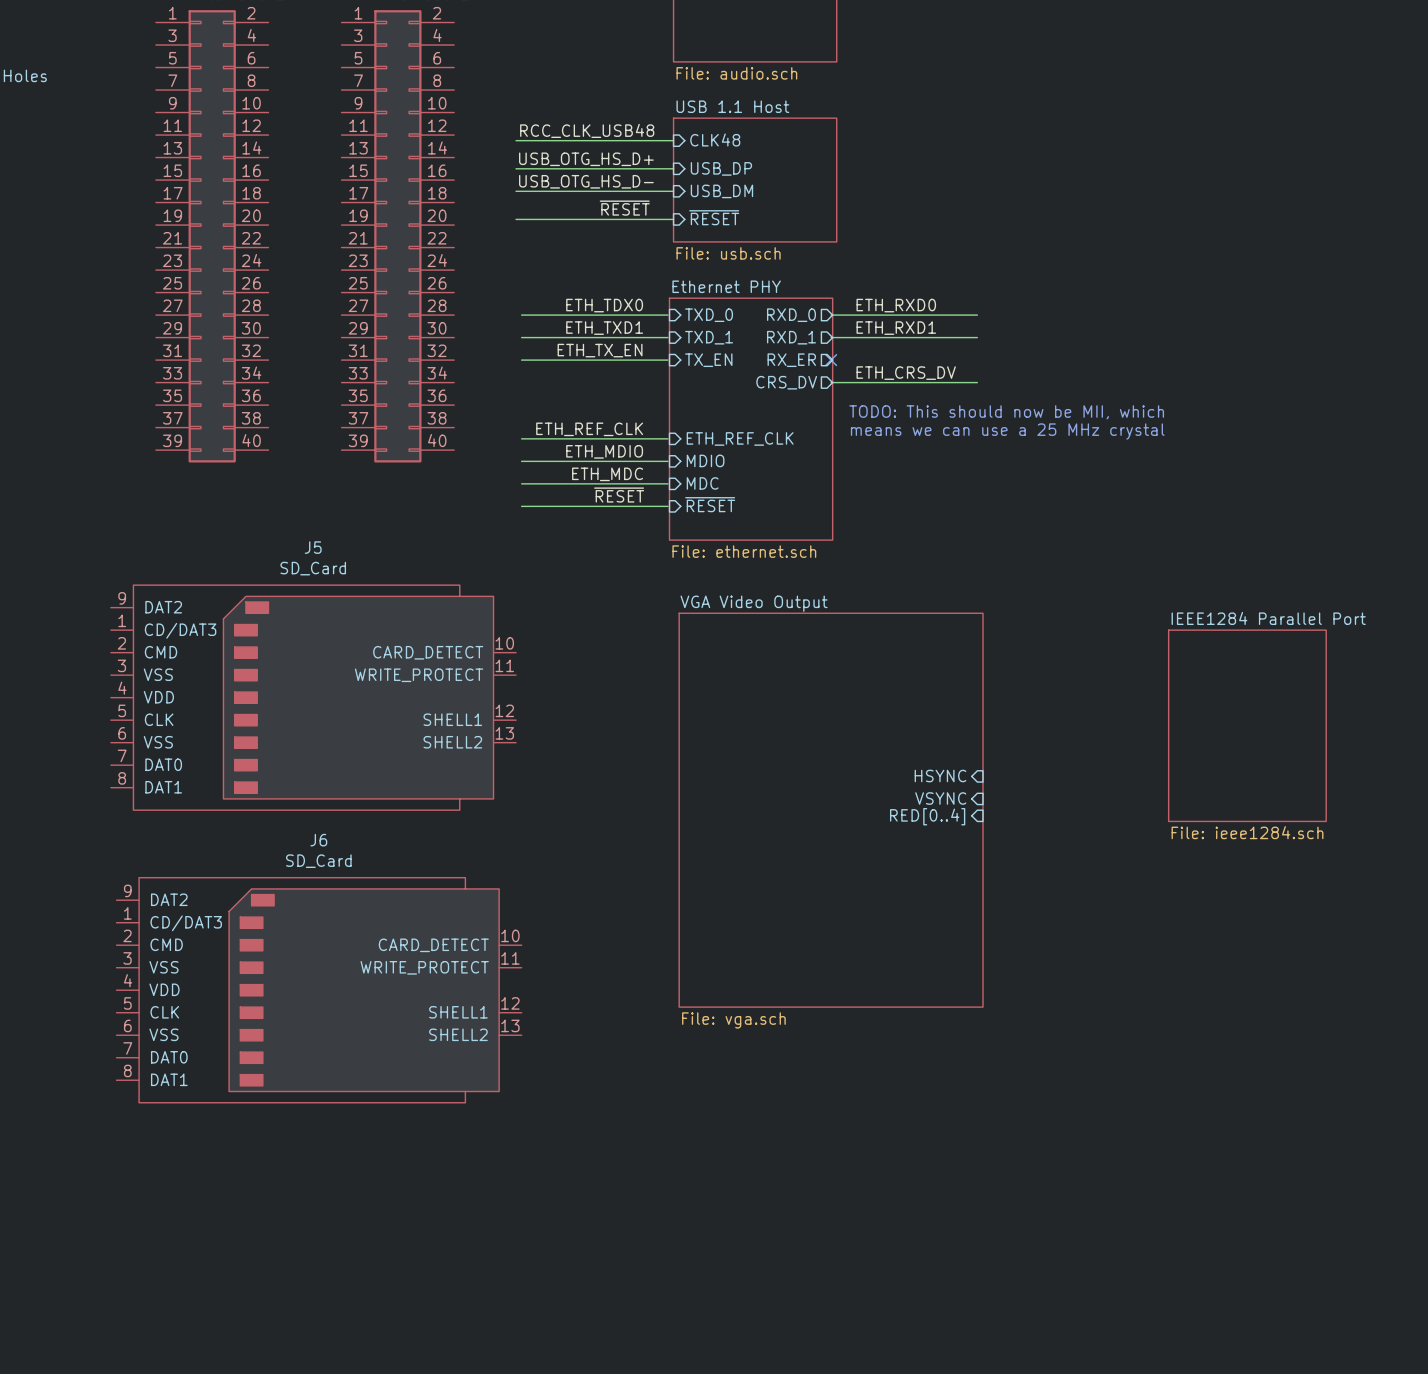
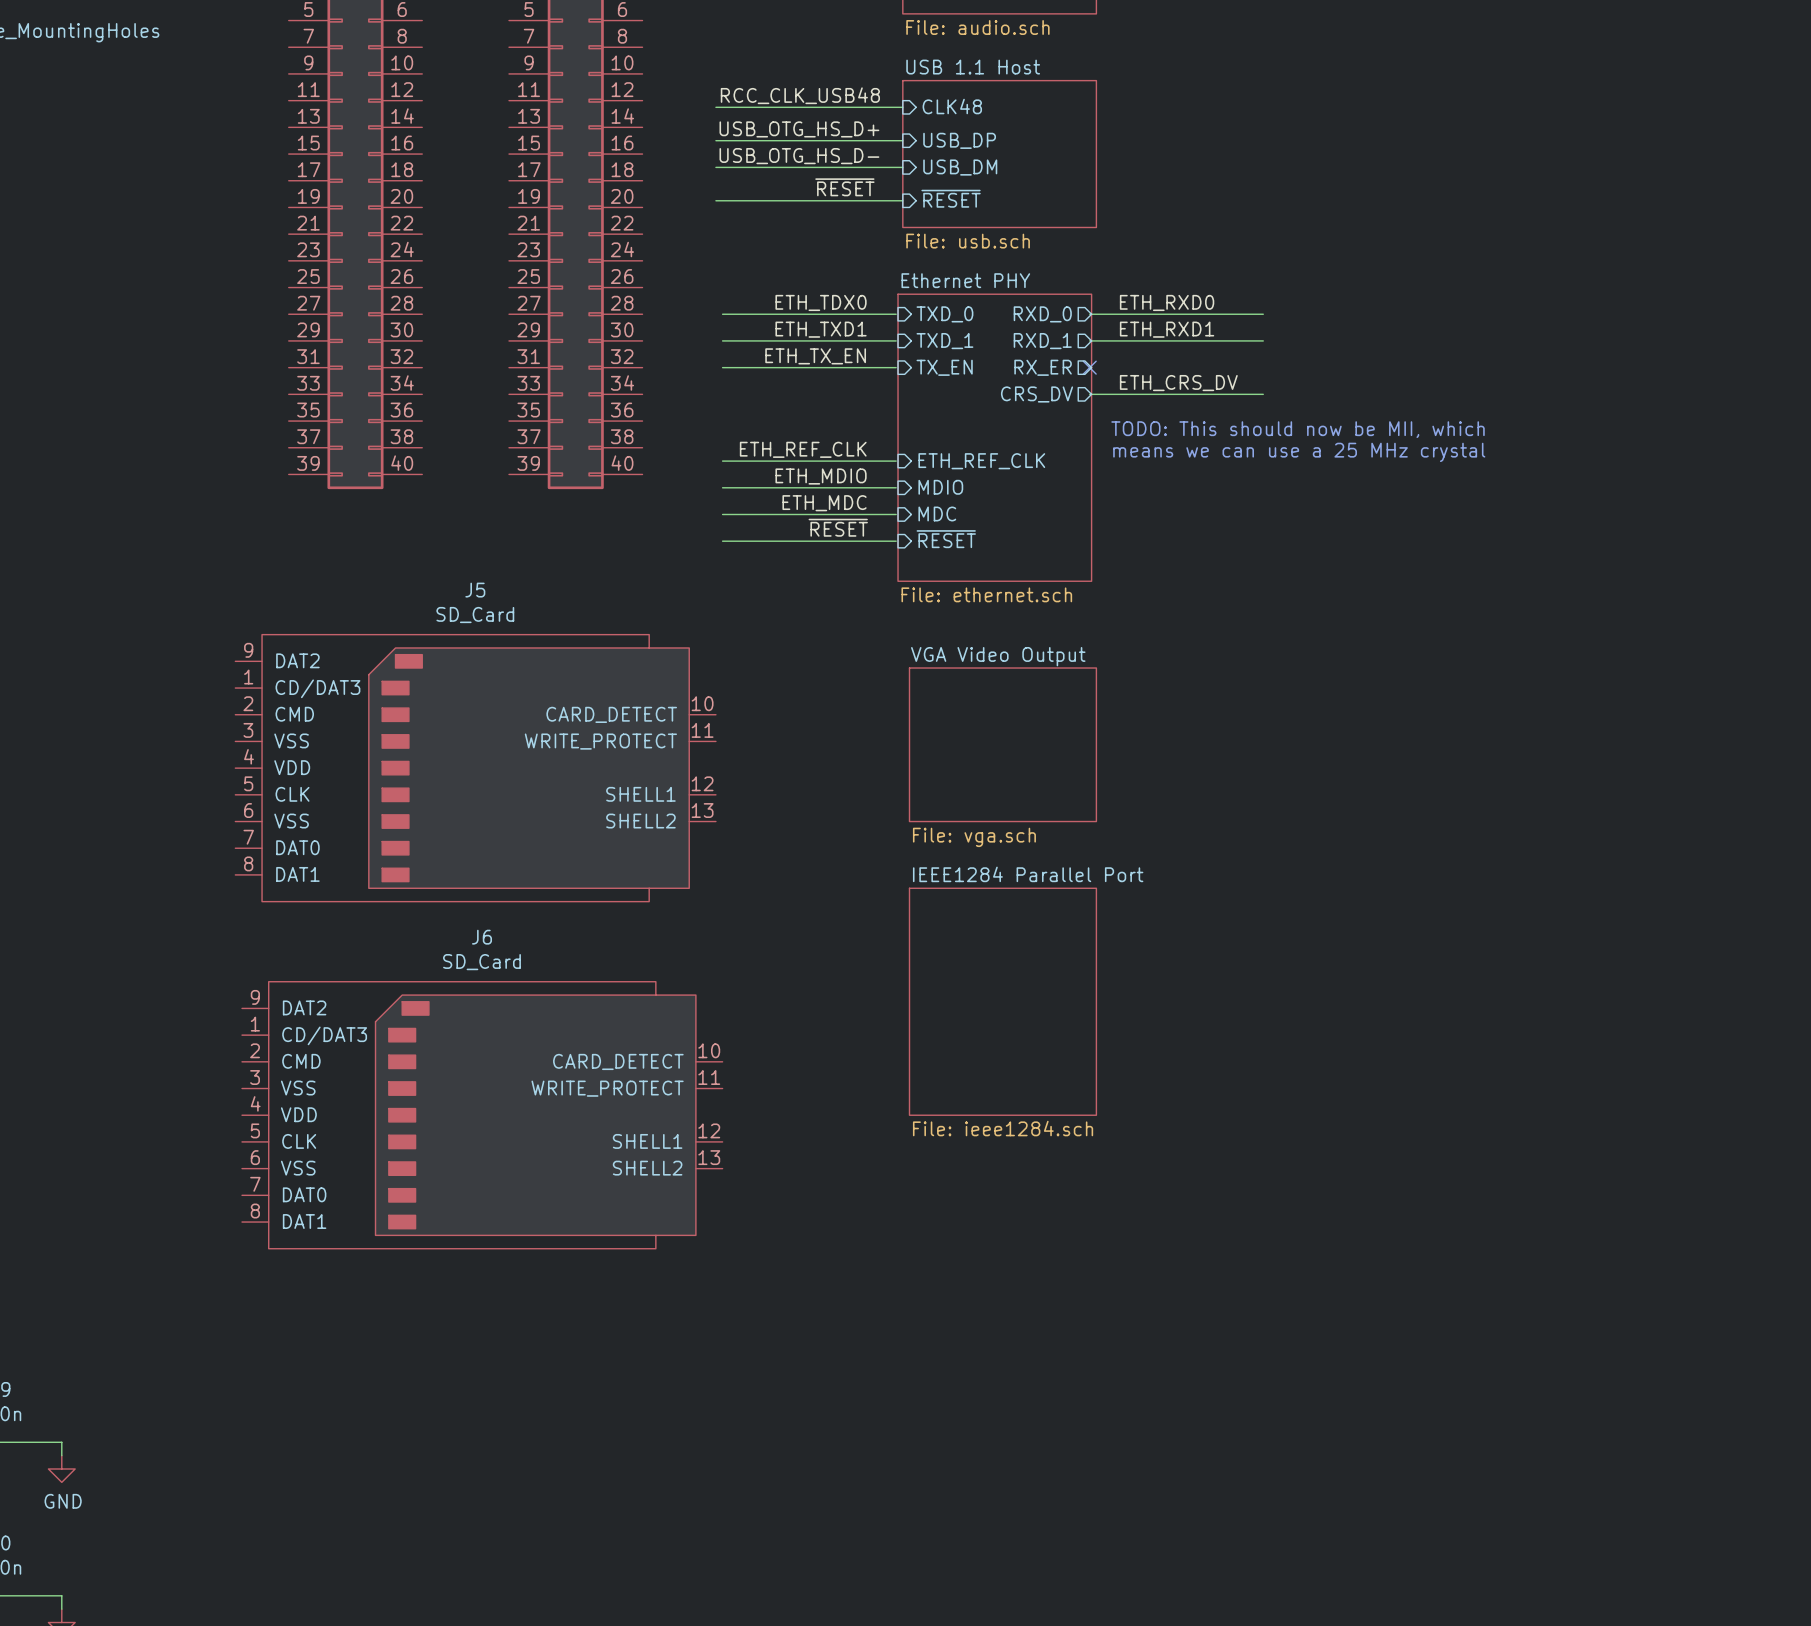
sheet VGA Video Output: none -> File: vga.sch (1002, 744)
sheet IEEE1284 Parallel Port position: (1247, 725) -> (1002, 1001)
sheet pin: HSYNC (940, 776) -> none
sheet pin: VSYNC (940, 798) -> none
sheet VGA Video Output: File: vga.sch (831, 810) -> none
sheet pin: RED[0..4] (927, 816) -> none

